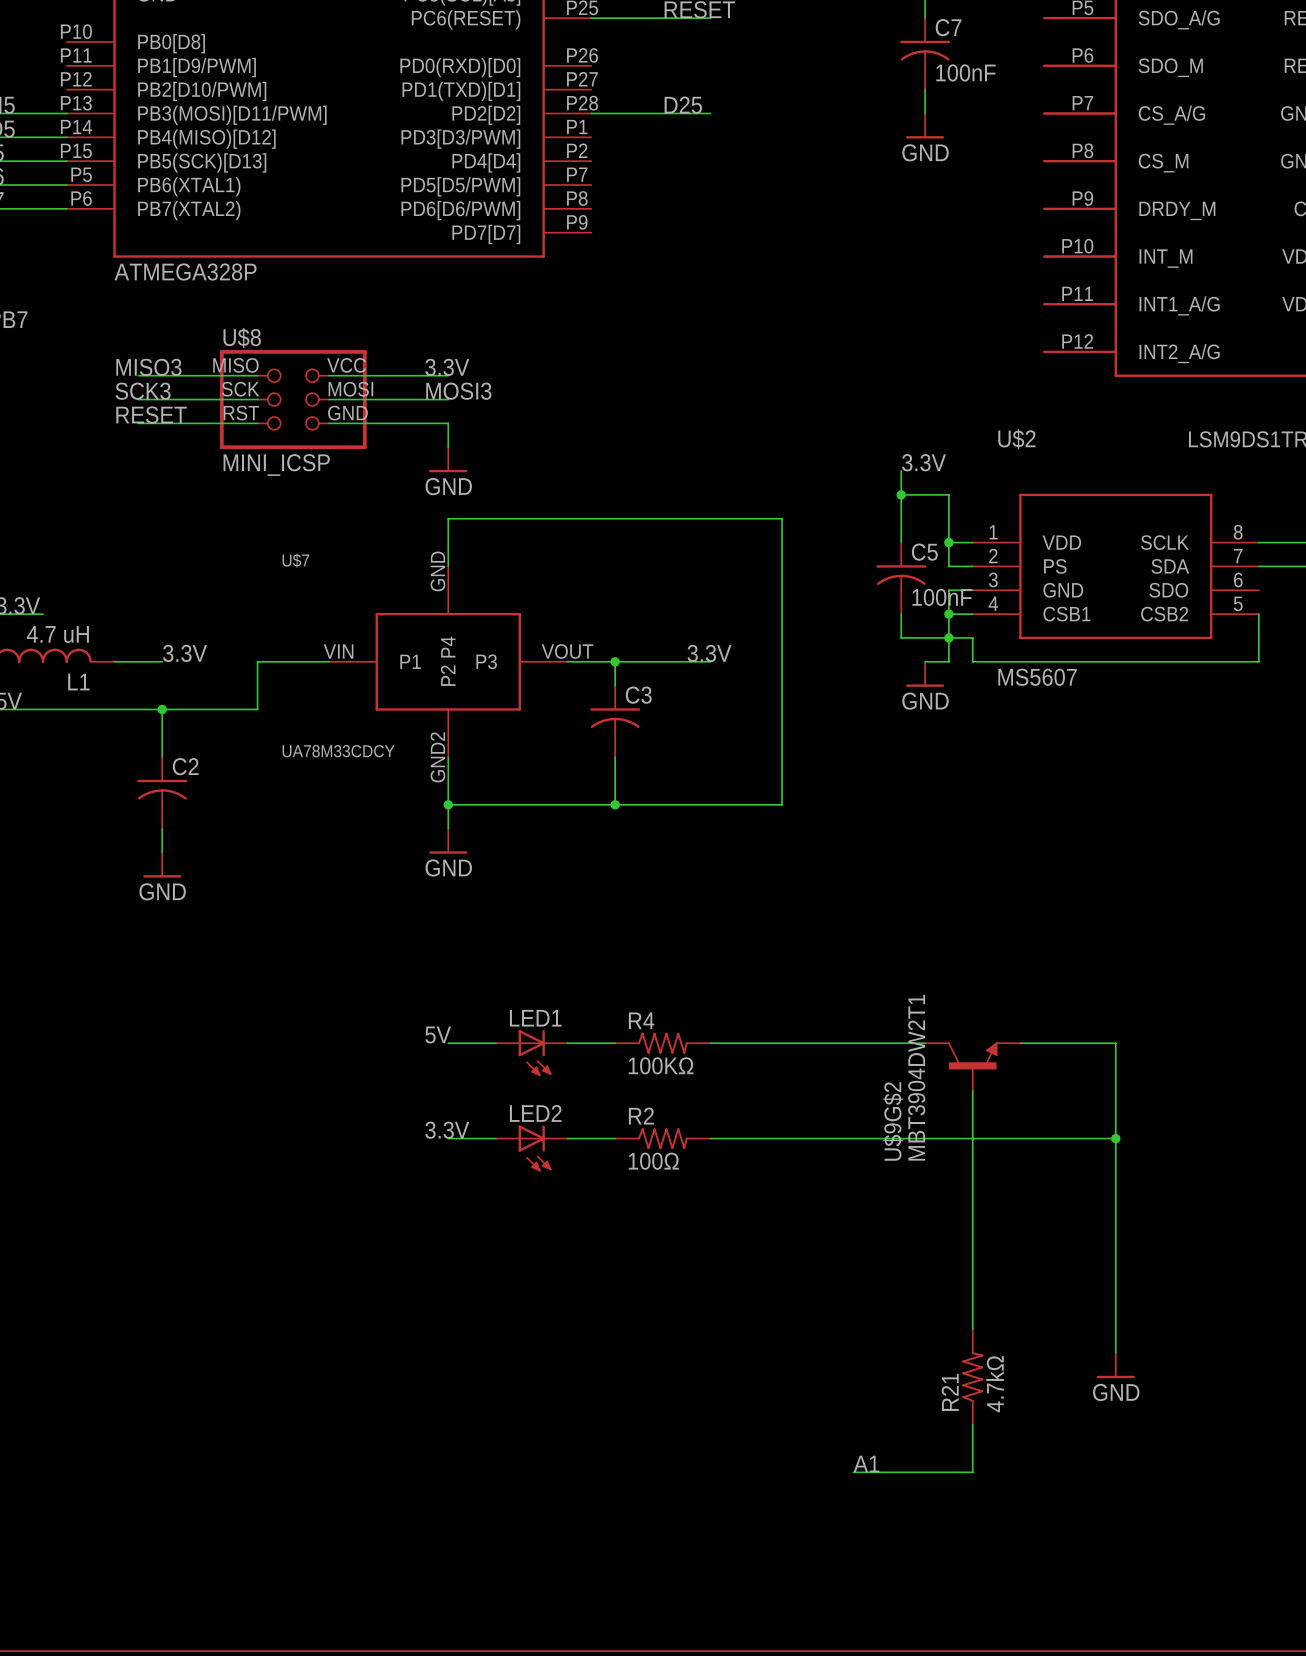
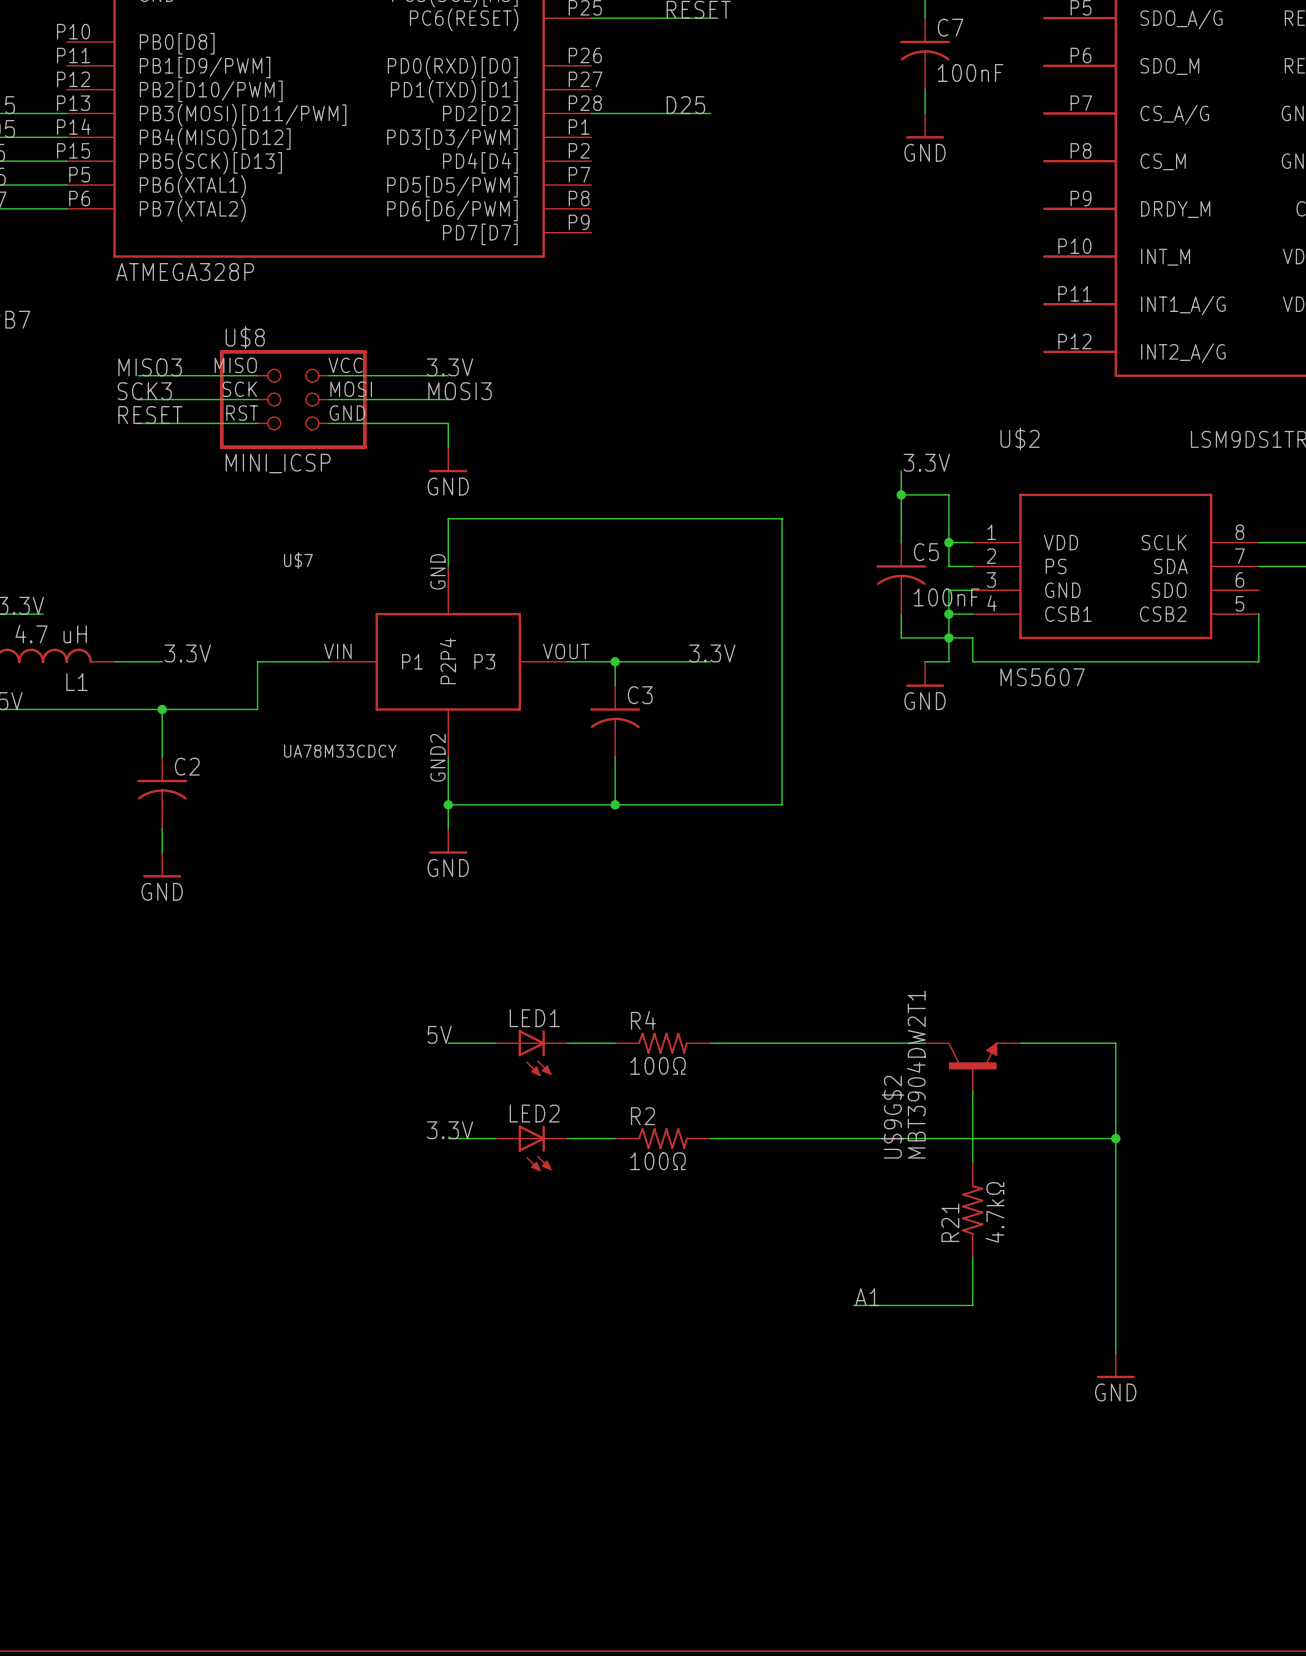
R4 value: 100KΩ (661, 1065) -> 100Ω (658, 1065)
wire: (972, 1305) (972, 1329) -> (972, 1305) (853, 1305)
R21 position: (972, 1376) -> (972, 1210)
wire: (972, 1424) (972, 1472) (853, 1472) -> none
label position: A1 (866, 1463) -> A1 (867, 1297)

